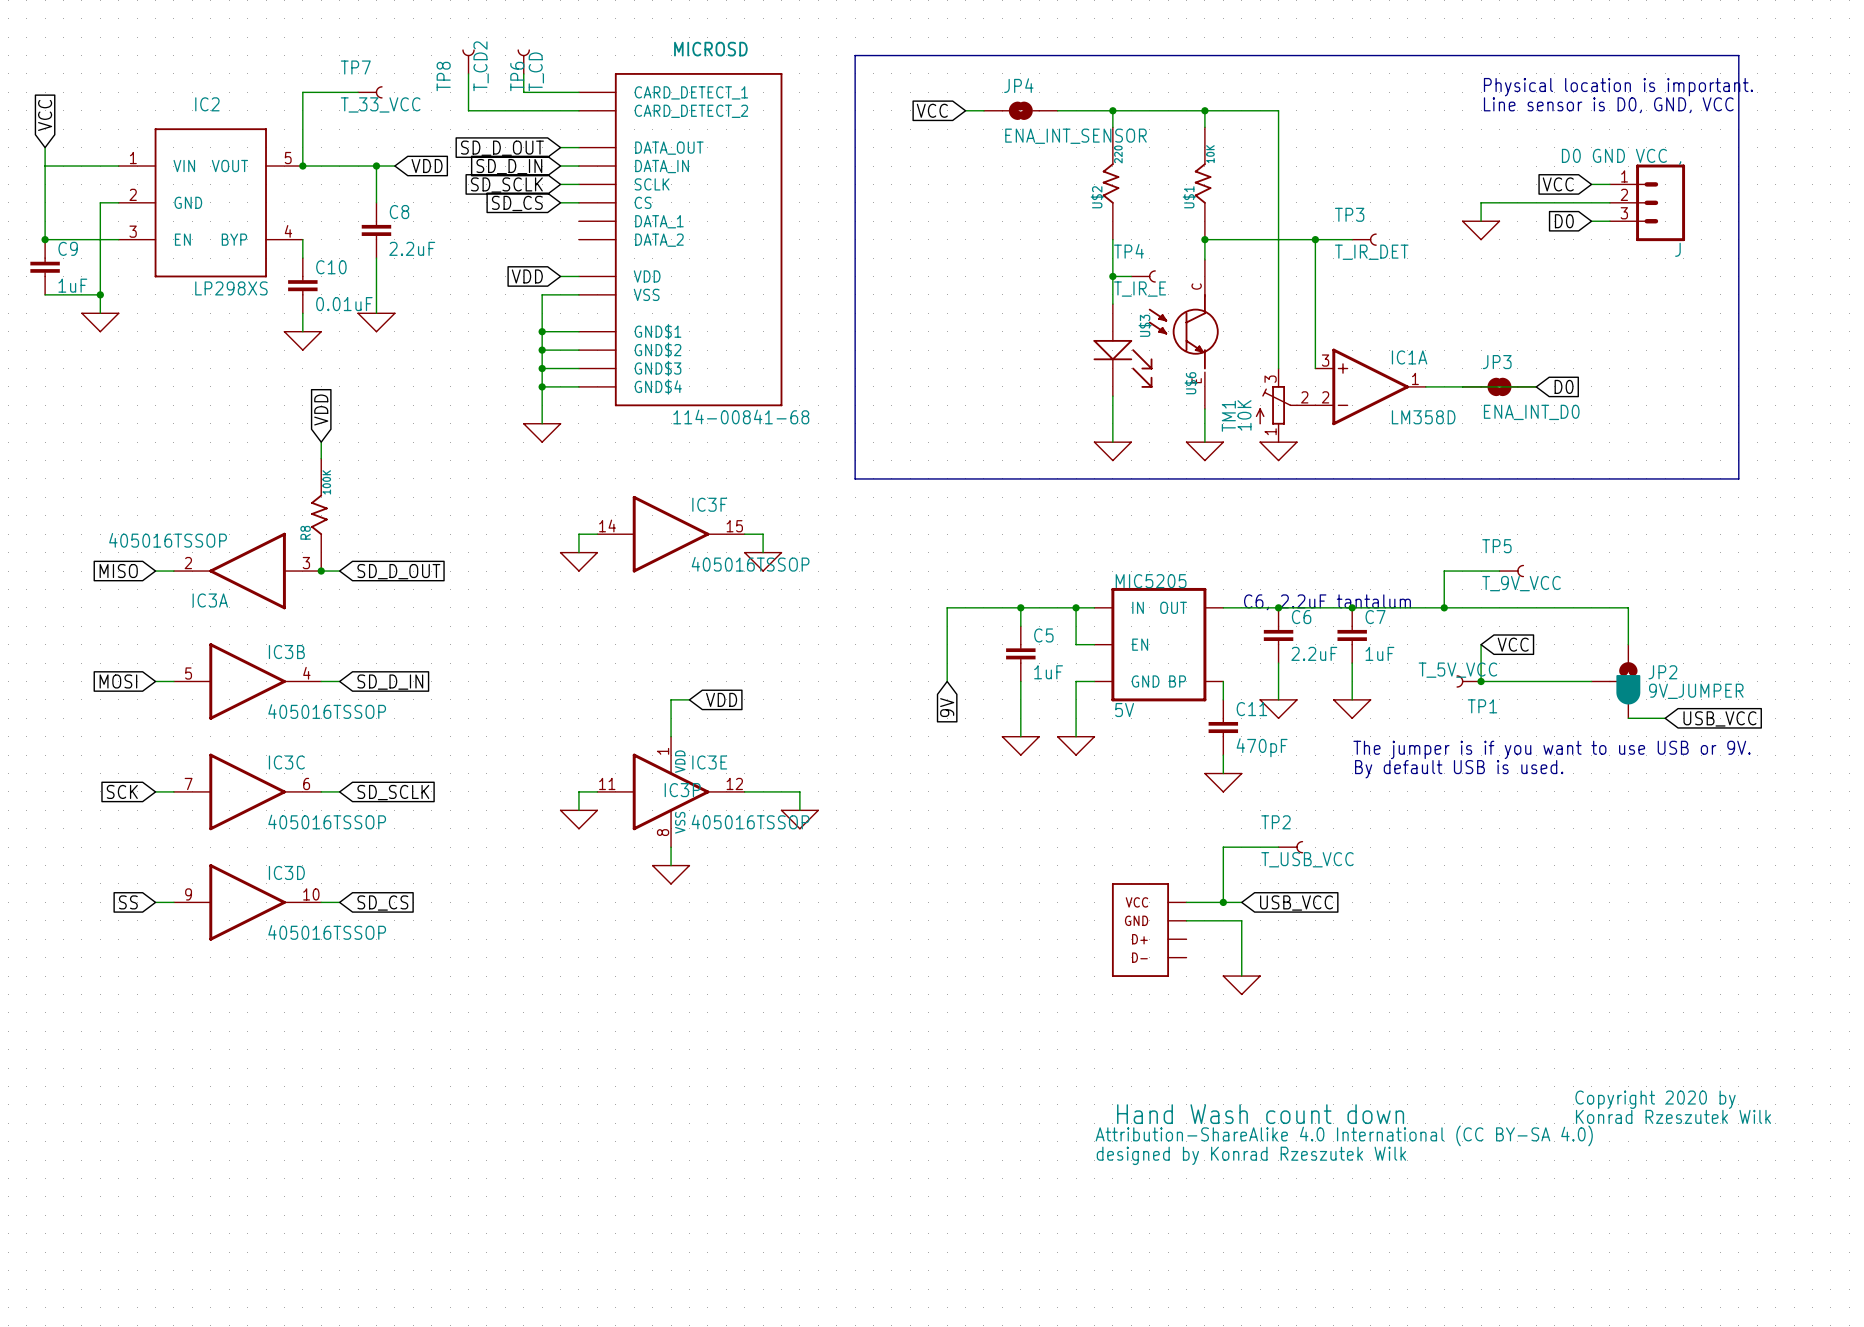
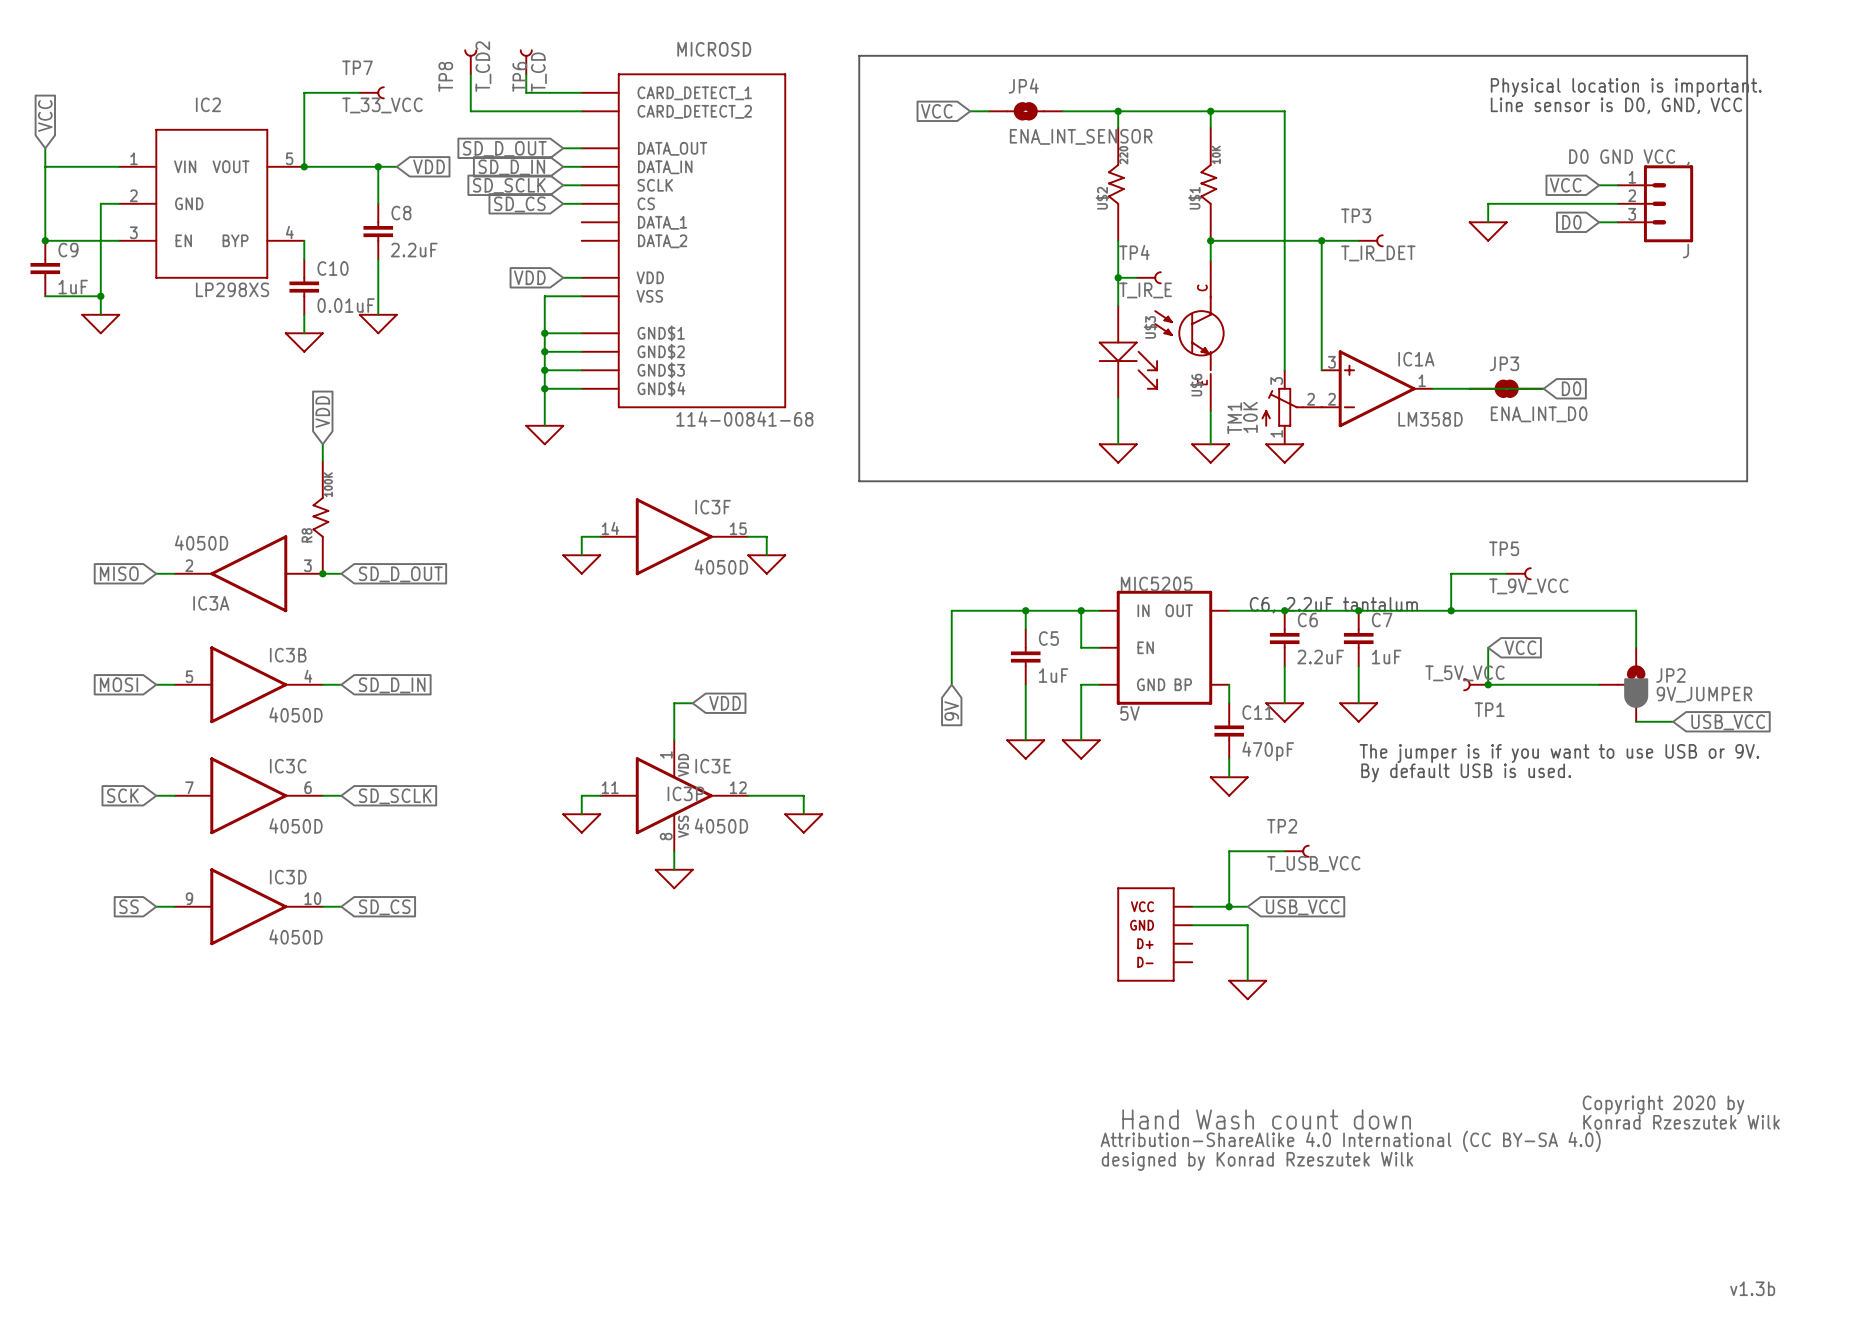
IC3A value: 405016TSSOP (168, 540) -> 4050D (201, 542)
IC3F value: 405016TSSOP (750, 564) -> 4050D (721, 566)
IC3B value: 405016TSSOP (327, 711) -> 4050D (295, 714)
IC3C value: 405016TSSOP (327, 822) -> 4050D (295, 825)
IC3E value: 405016TSSOP (750, 822) -> 4050D (721, 825)
IC3D value: 405016TSSOP (327, 932) -> 4050D (295, 936)
text: none -> v1.3b (1752, 1288)

